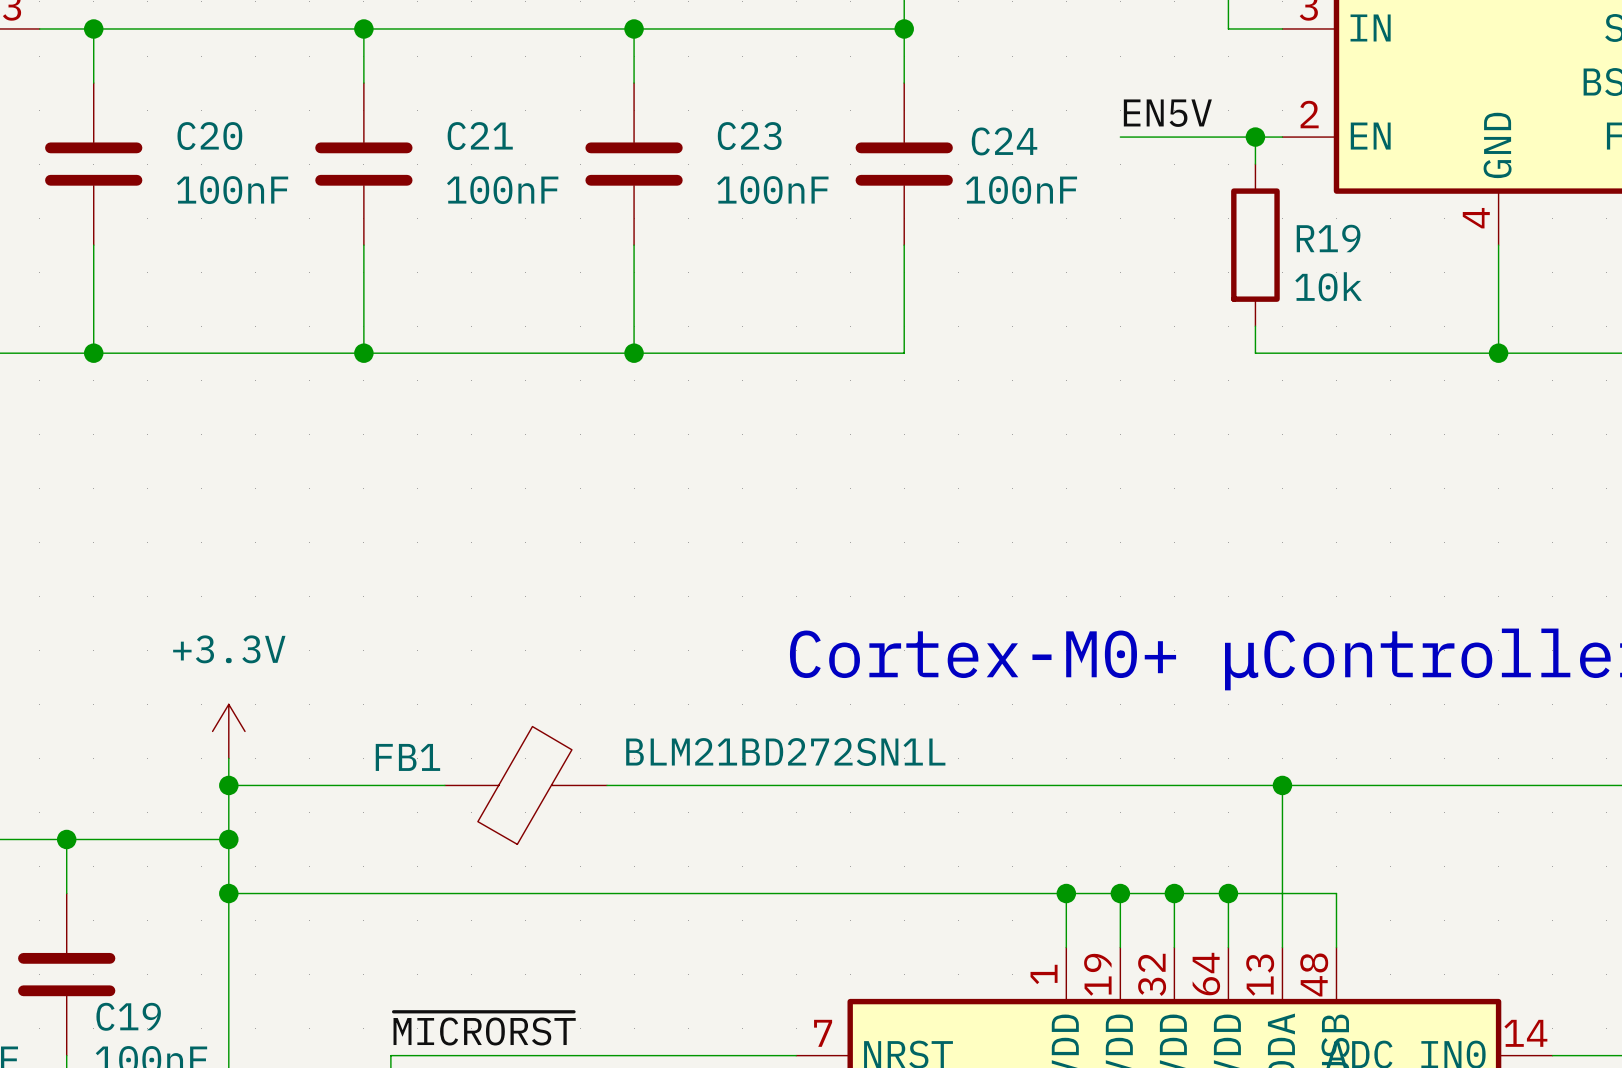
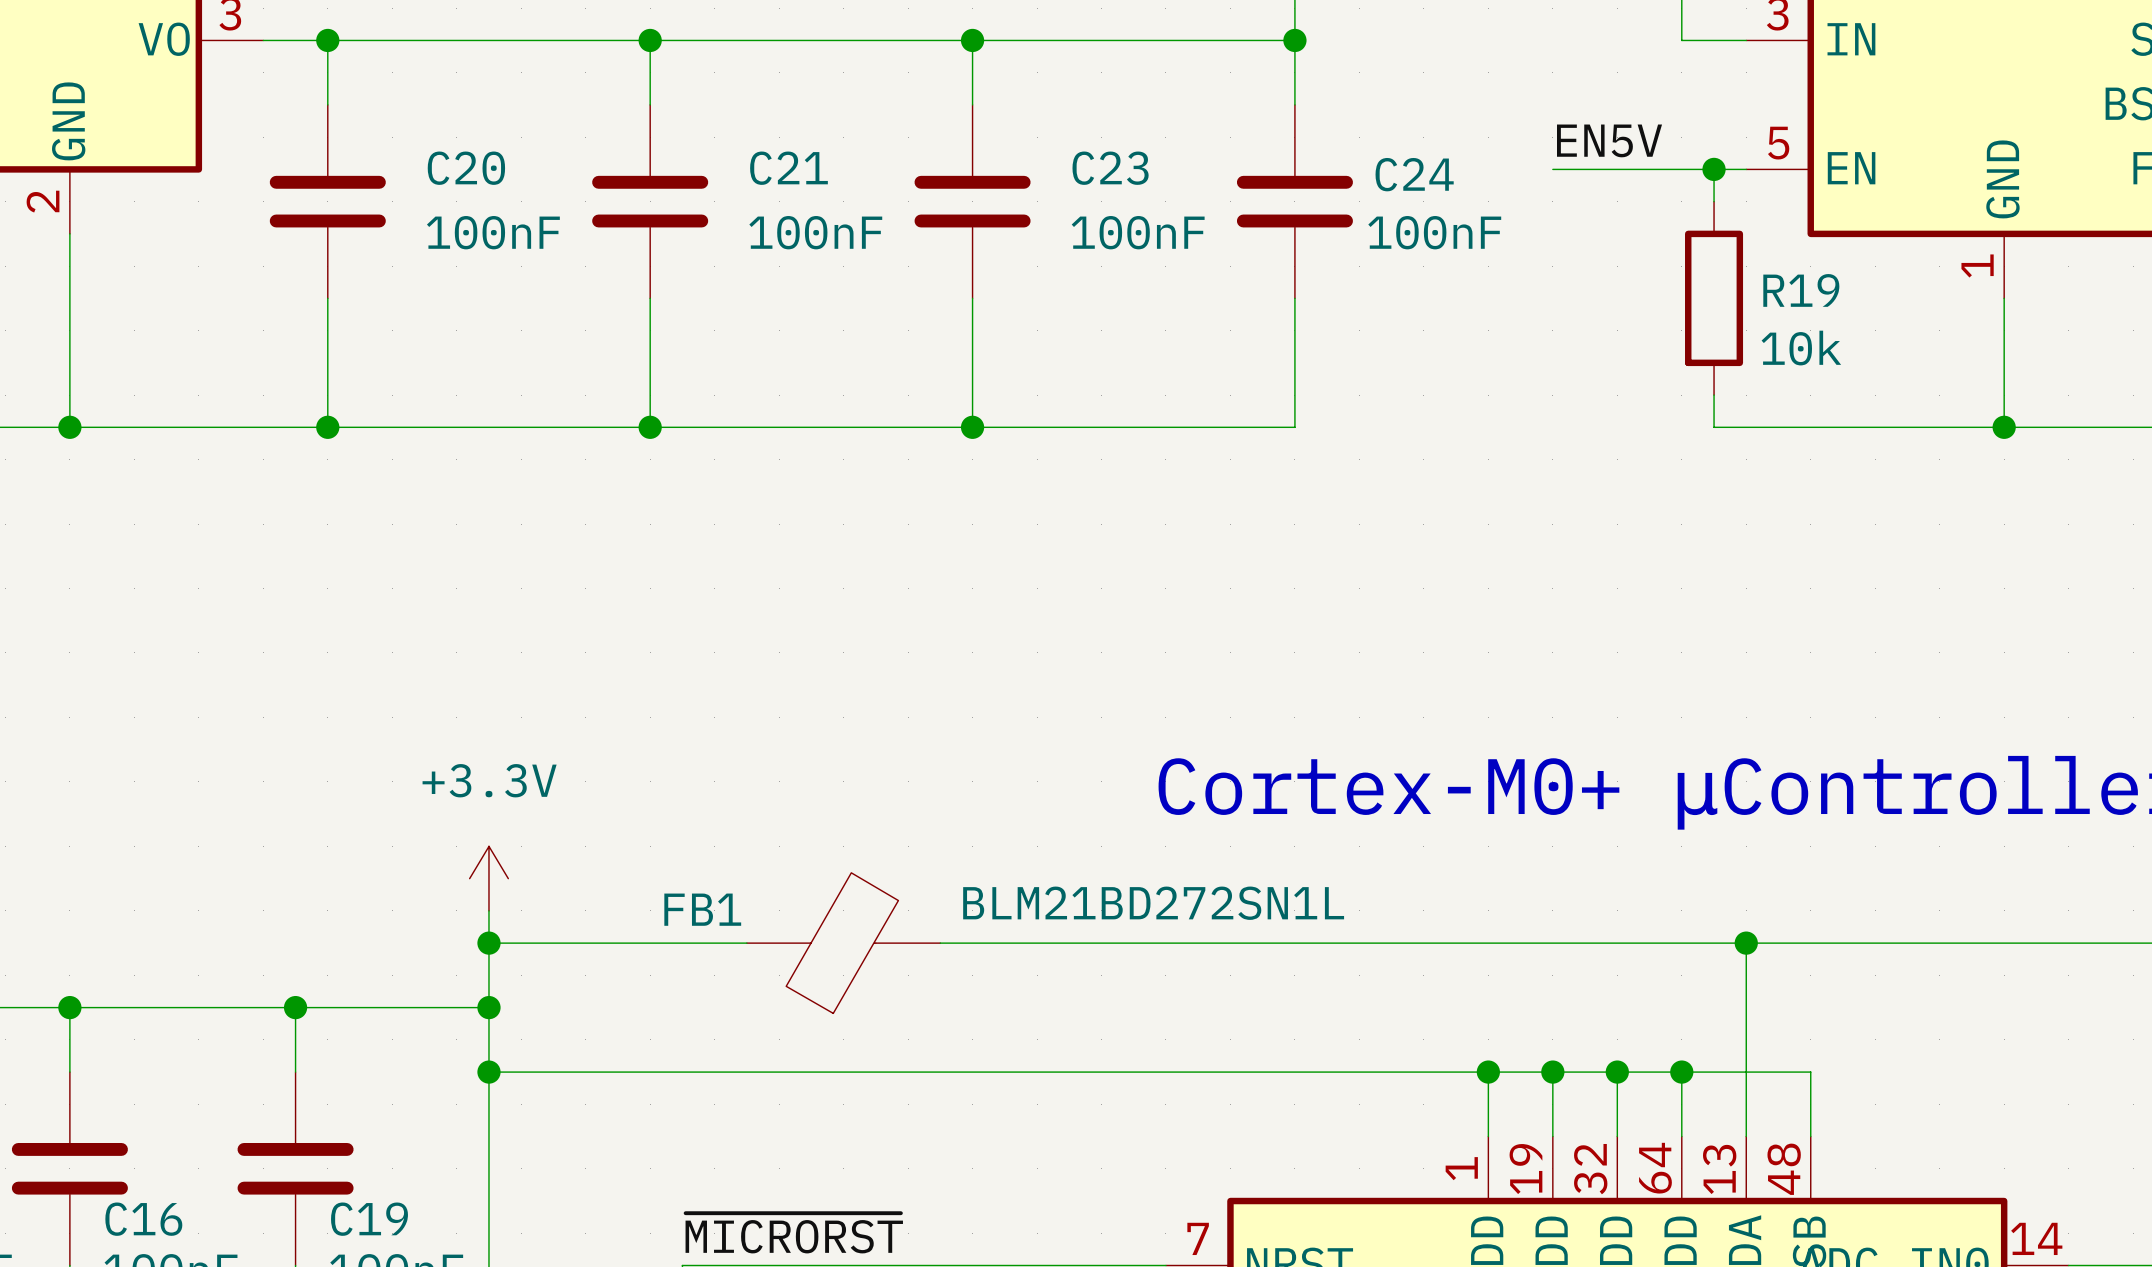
part pin number: 2 (1309, 114) -> 5 (1778, 143)
part pin number: 4 (1476, 218) -> 1 (1977, 265)

